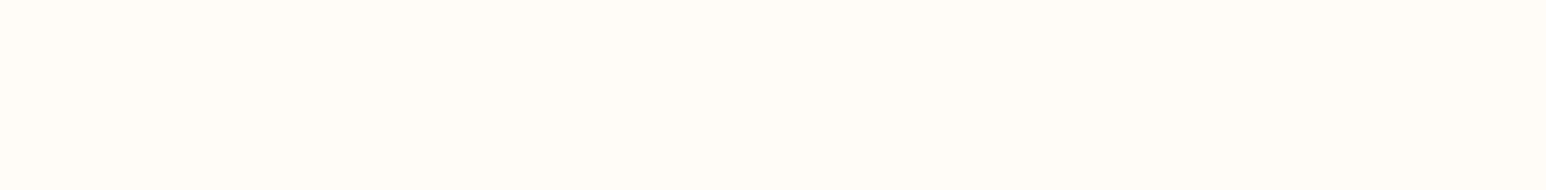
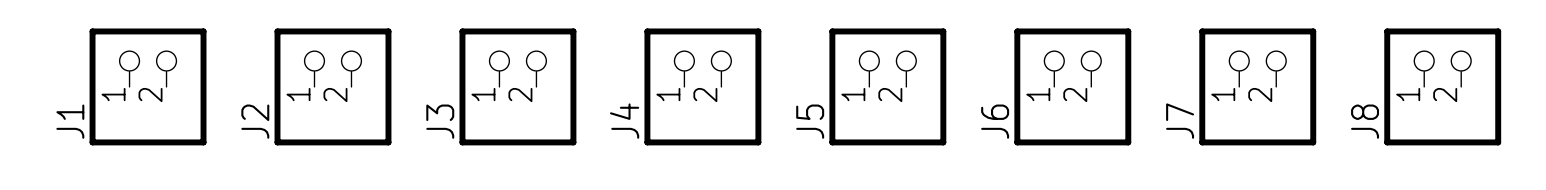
J1: none -> (148, 86)
J2: none -> (332, 86)
J3: none -> (517, 86)
J4: none -> (702, 86)
J5: none -> (887, 86)
J6: none -> (1072, 86)
J7: none -> (1257, 86)
J8: none -> (1442, 86)

